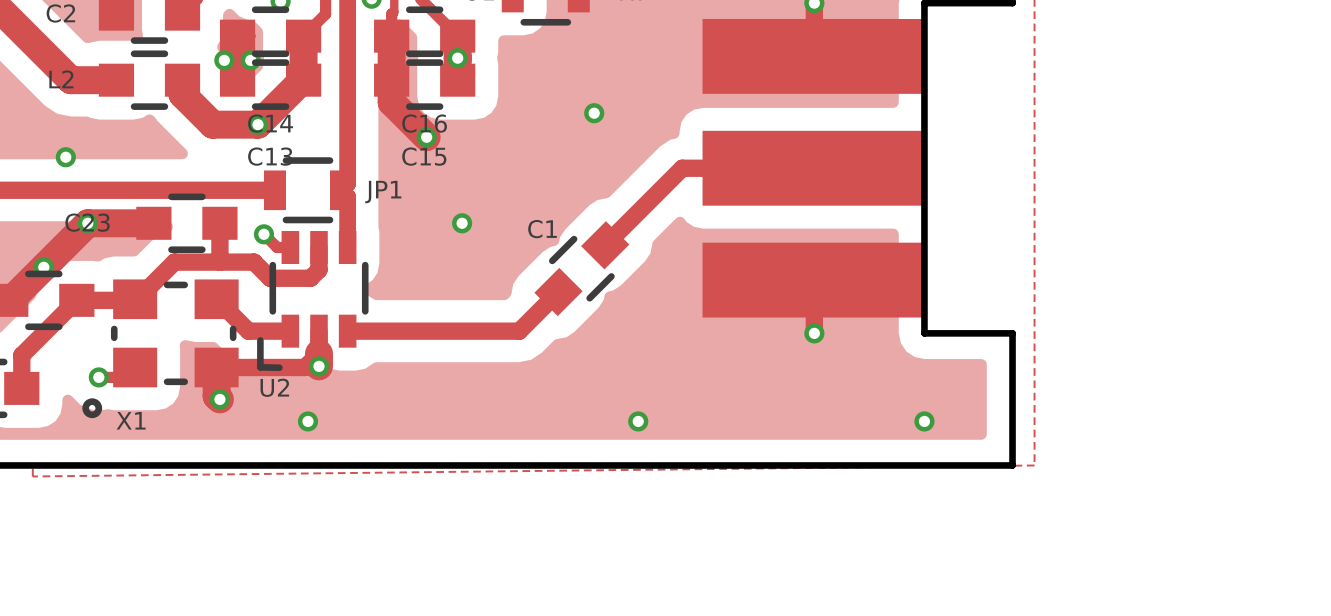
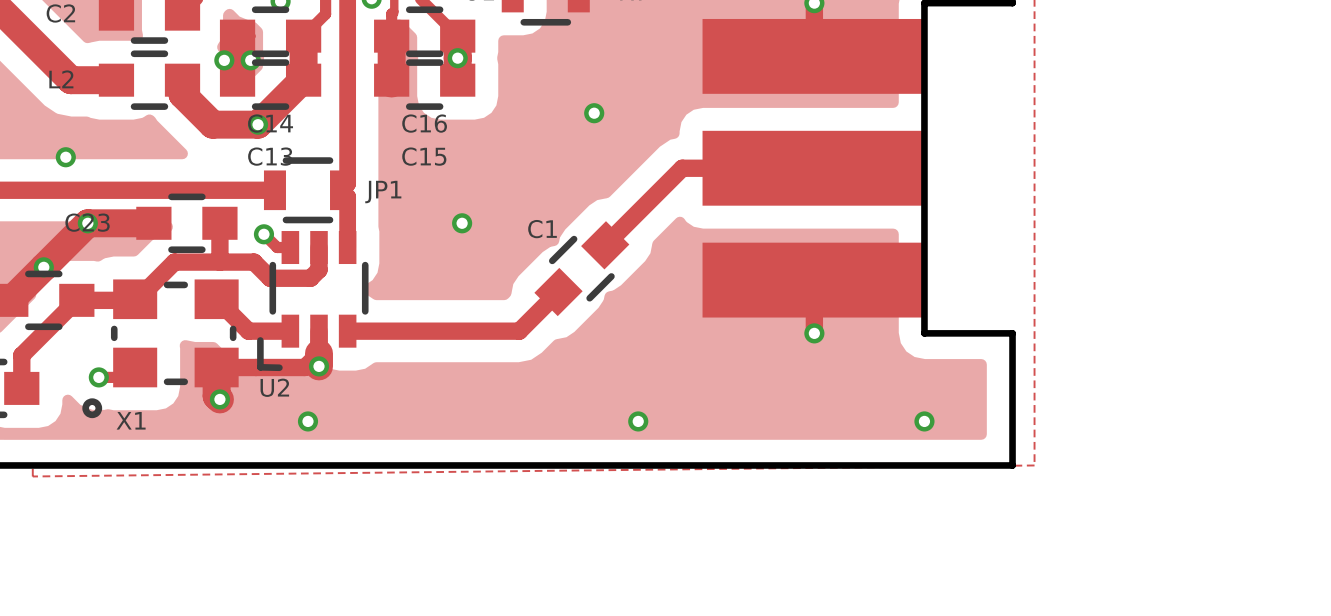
track: (391, 83) (391, 102) (426, 137) -> none
via: (426, 137) -> none

